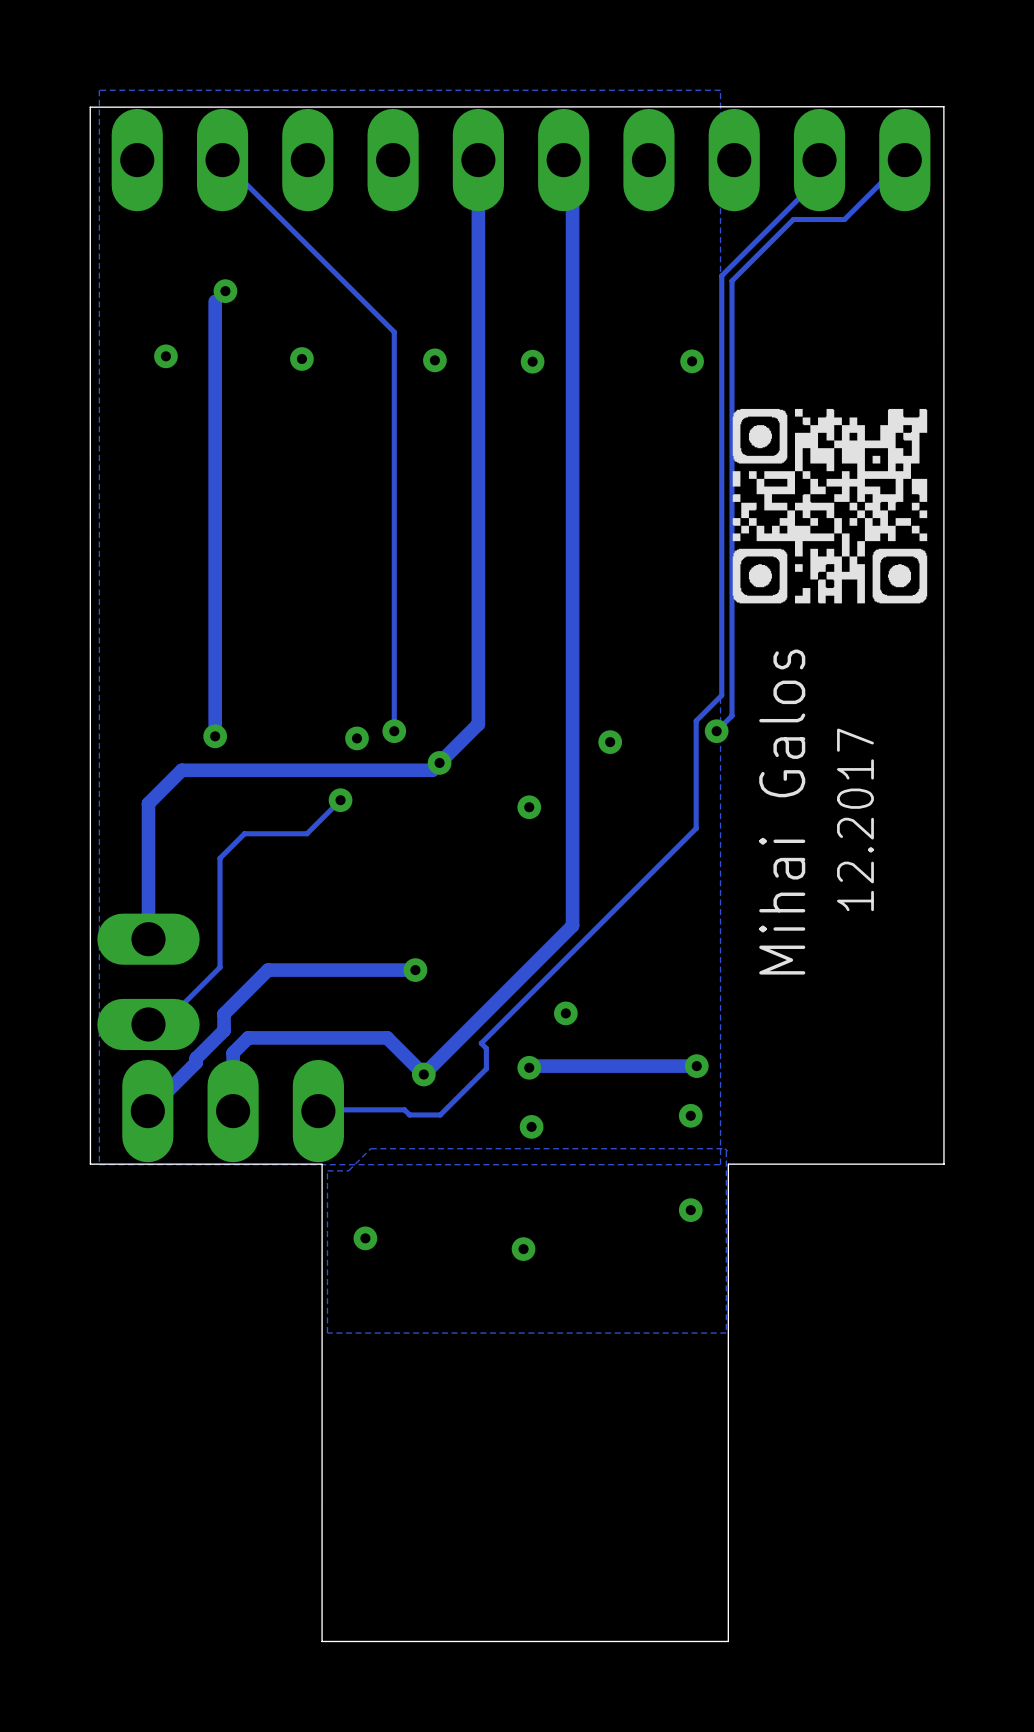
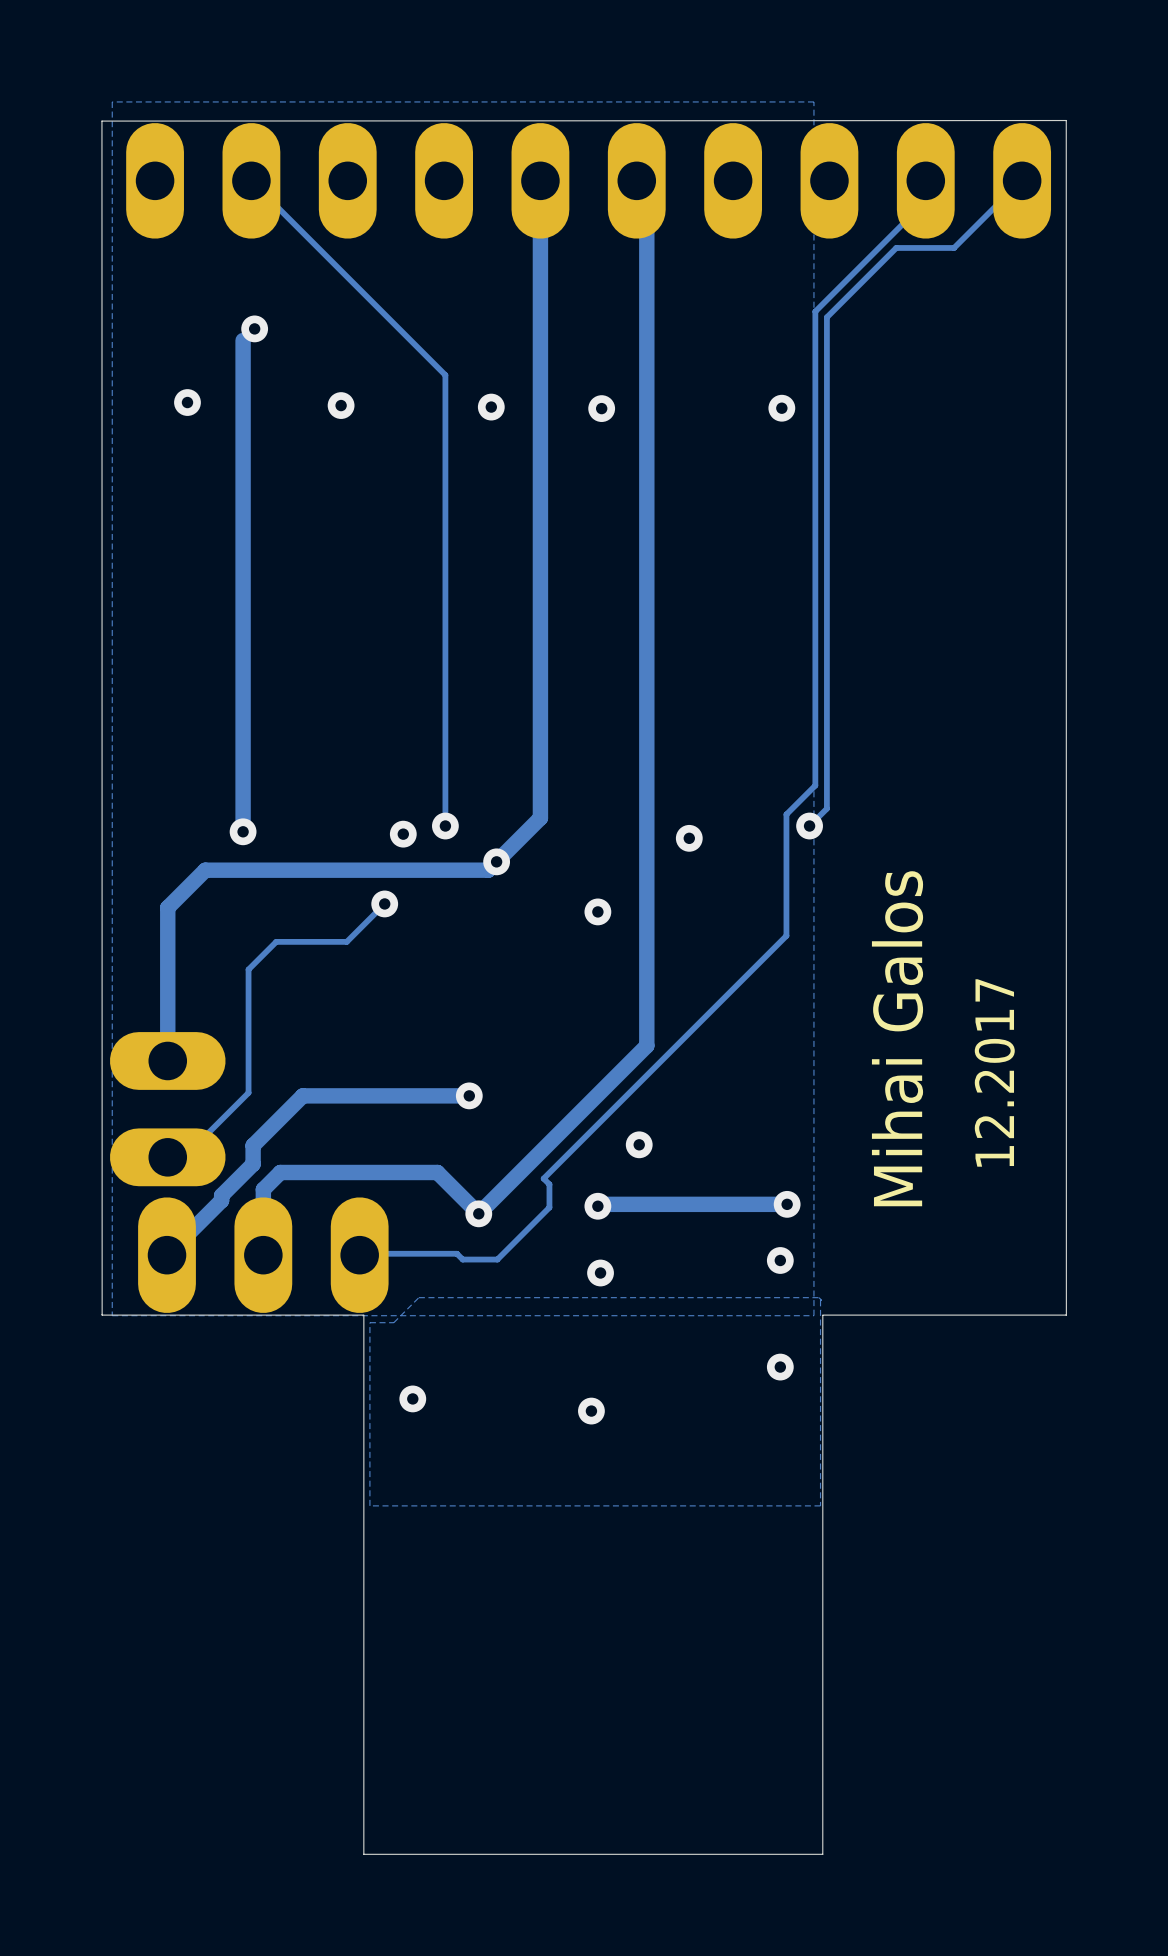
drawing: [732, 408, 928, 604] -> none
text position: Mihai Galos (782, 812) -> Mihai Galos (897, 1038)
text position: 12.2017 (855, 819) -> 12.2017 (994, 1072)

